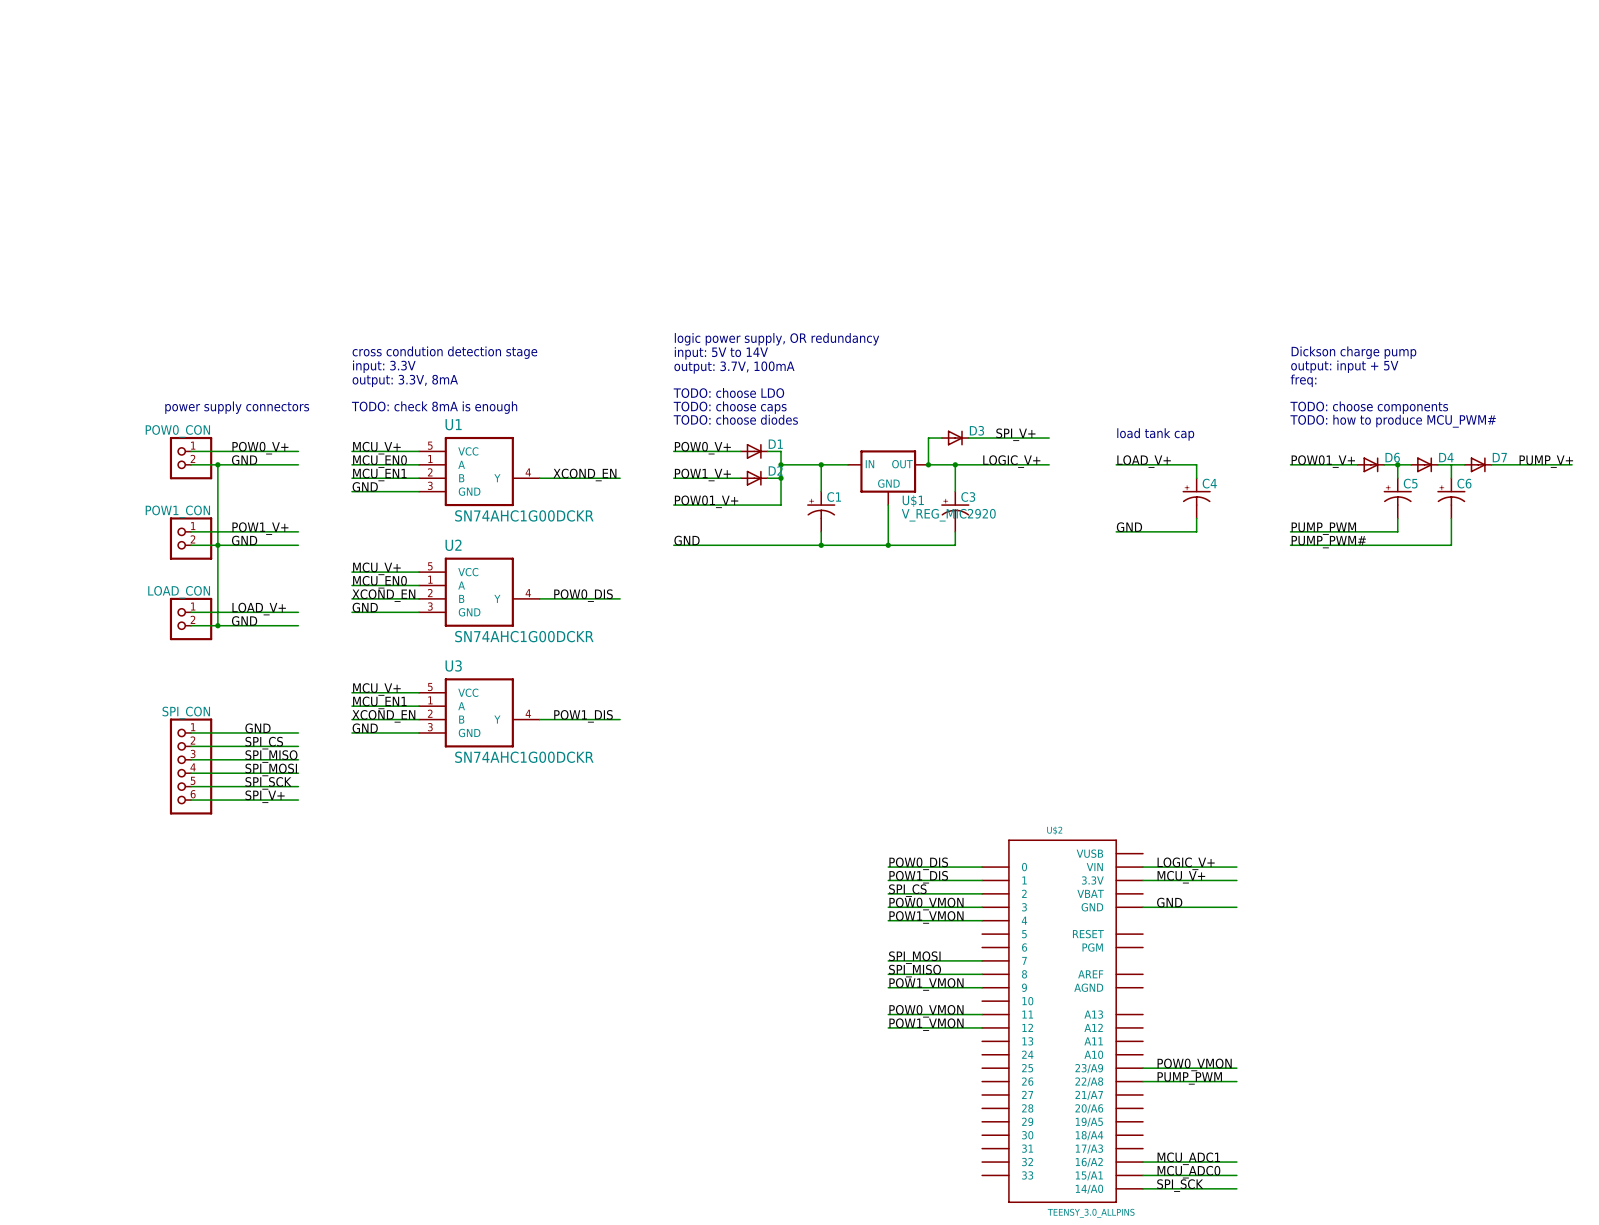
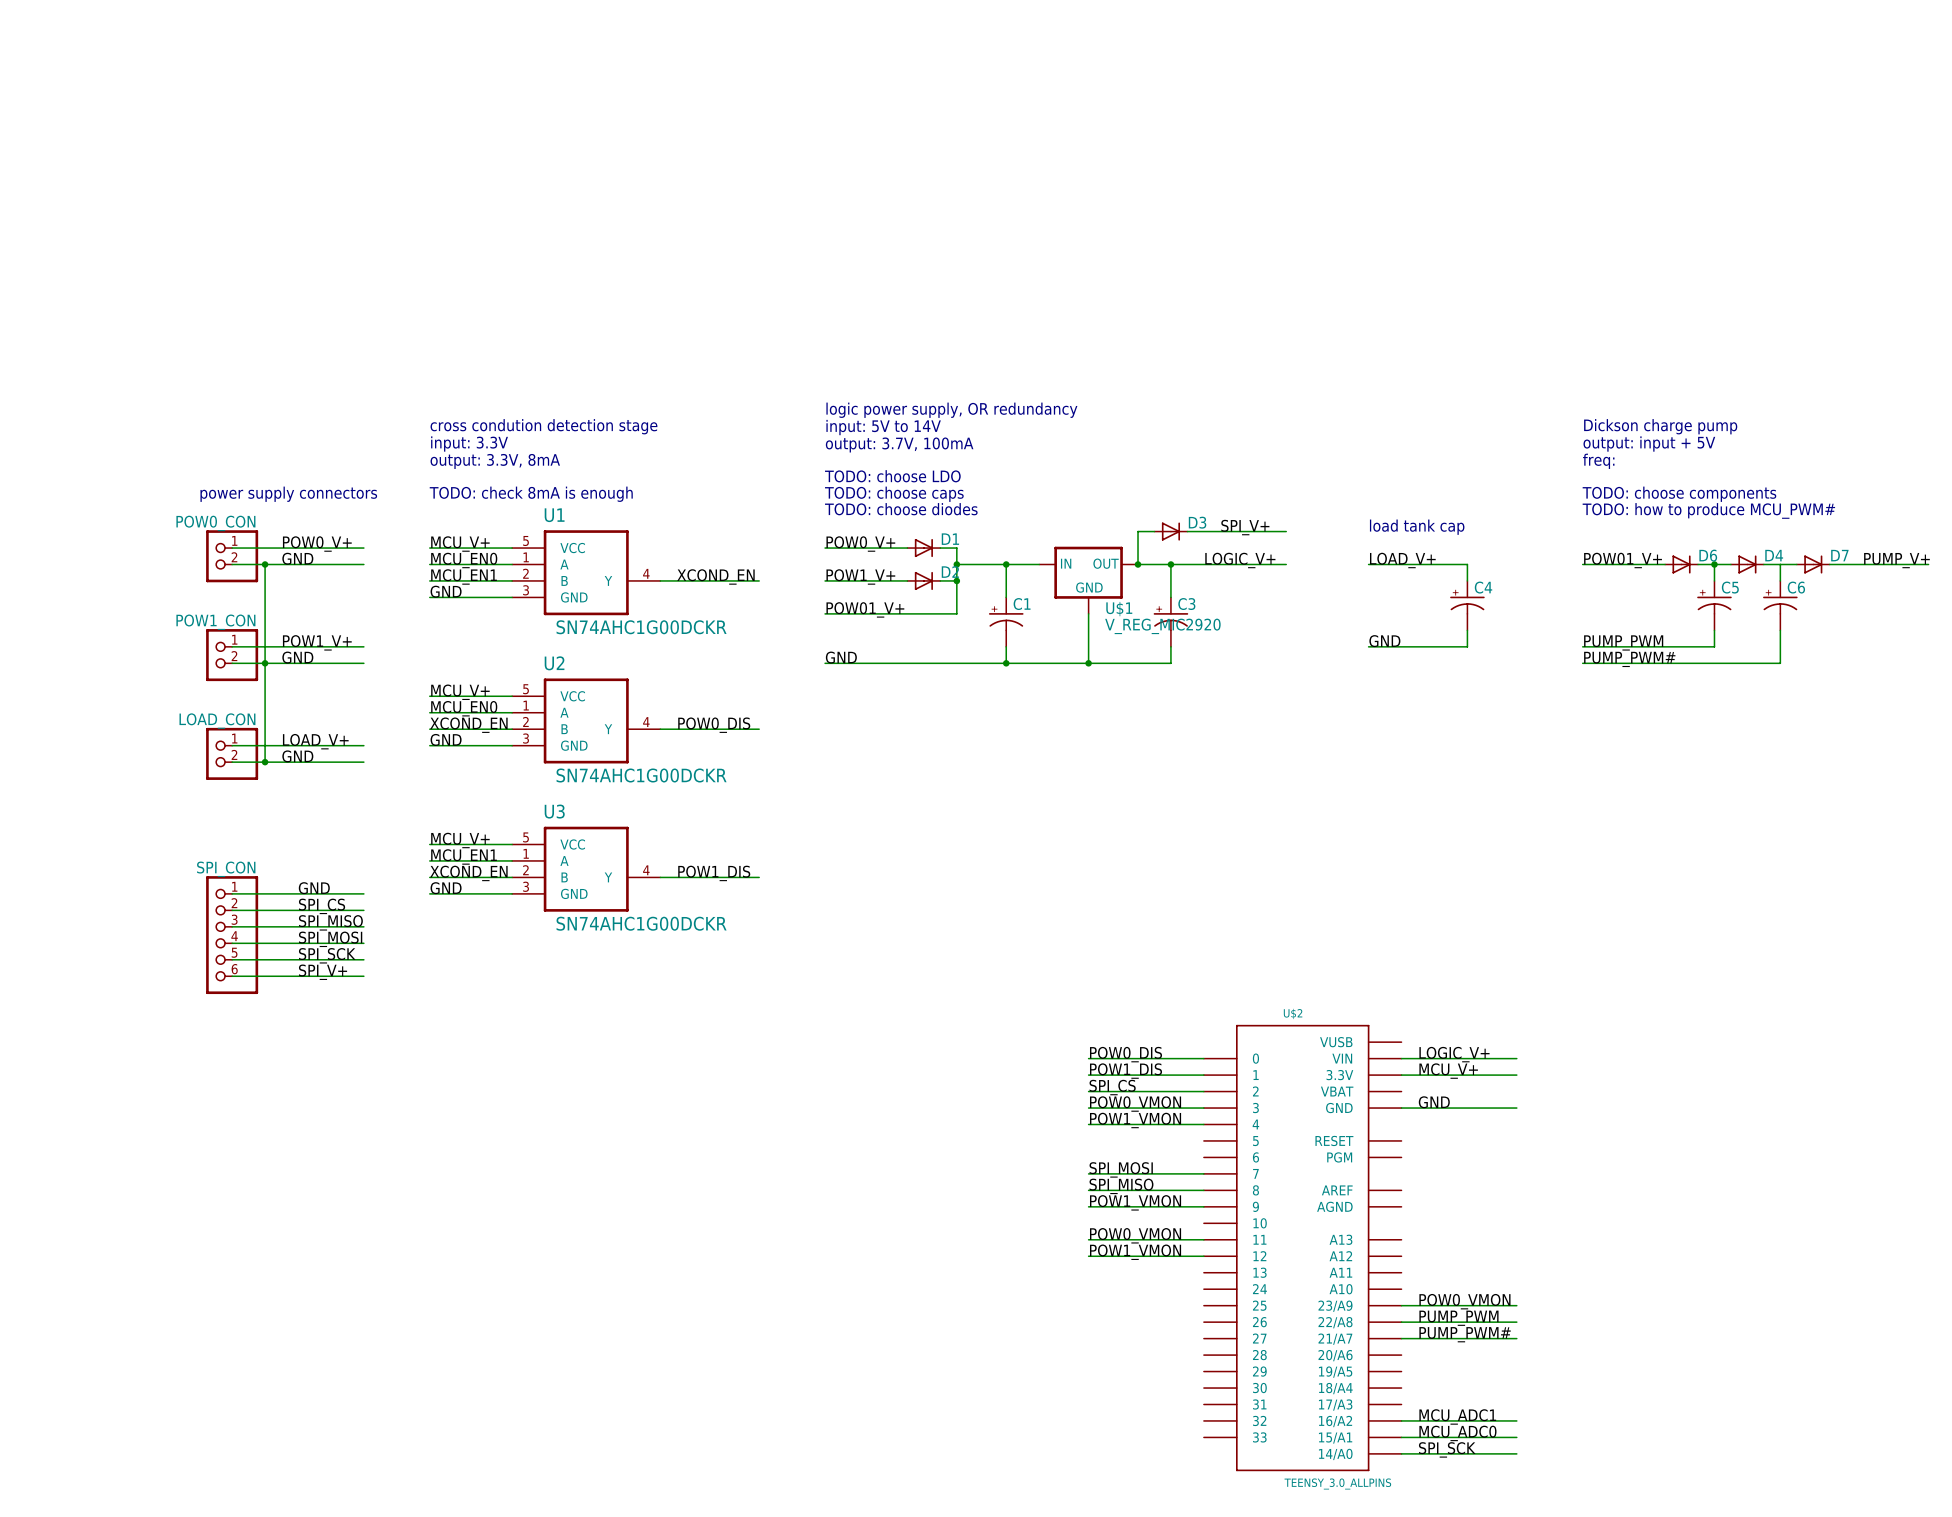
label: none -> PUMP_PWM# (1465, 1334)
wire: none -> (1401, 1338) (1516, 1338)

